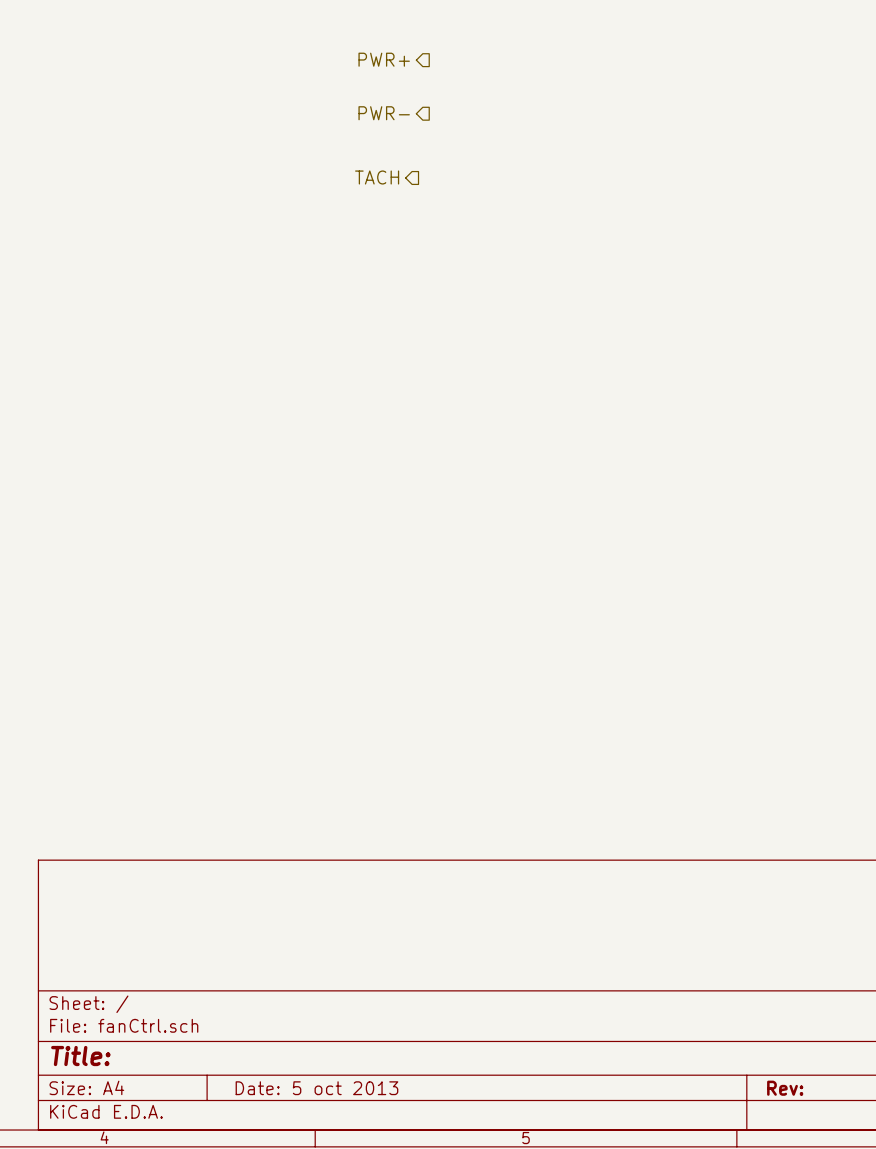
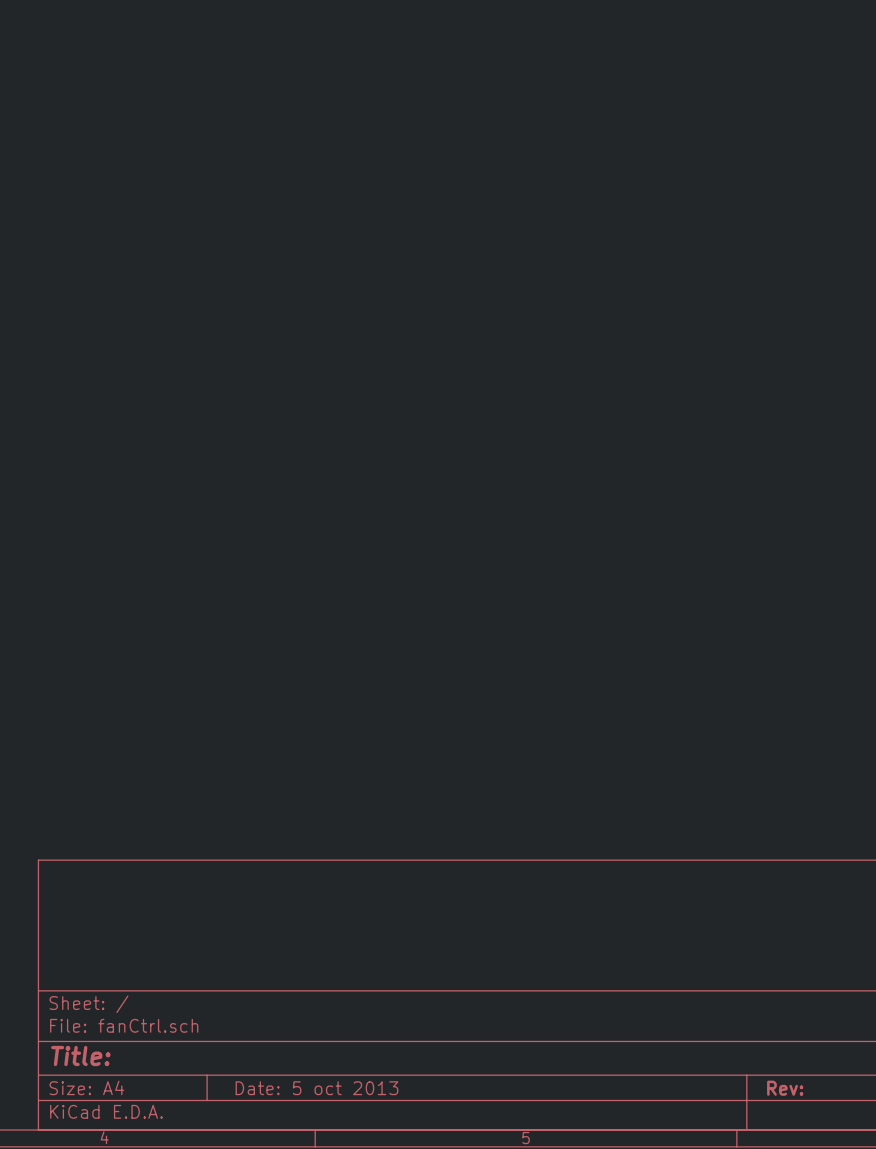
hierarchical label: PWR+ (384, 59) -> none
hierarchical label: PWR- (384, 113) -> none
hierarchical label: TACH (377, 177) -> none

